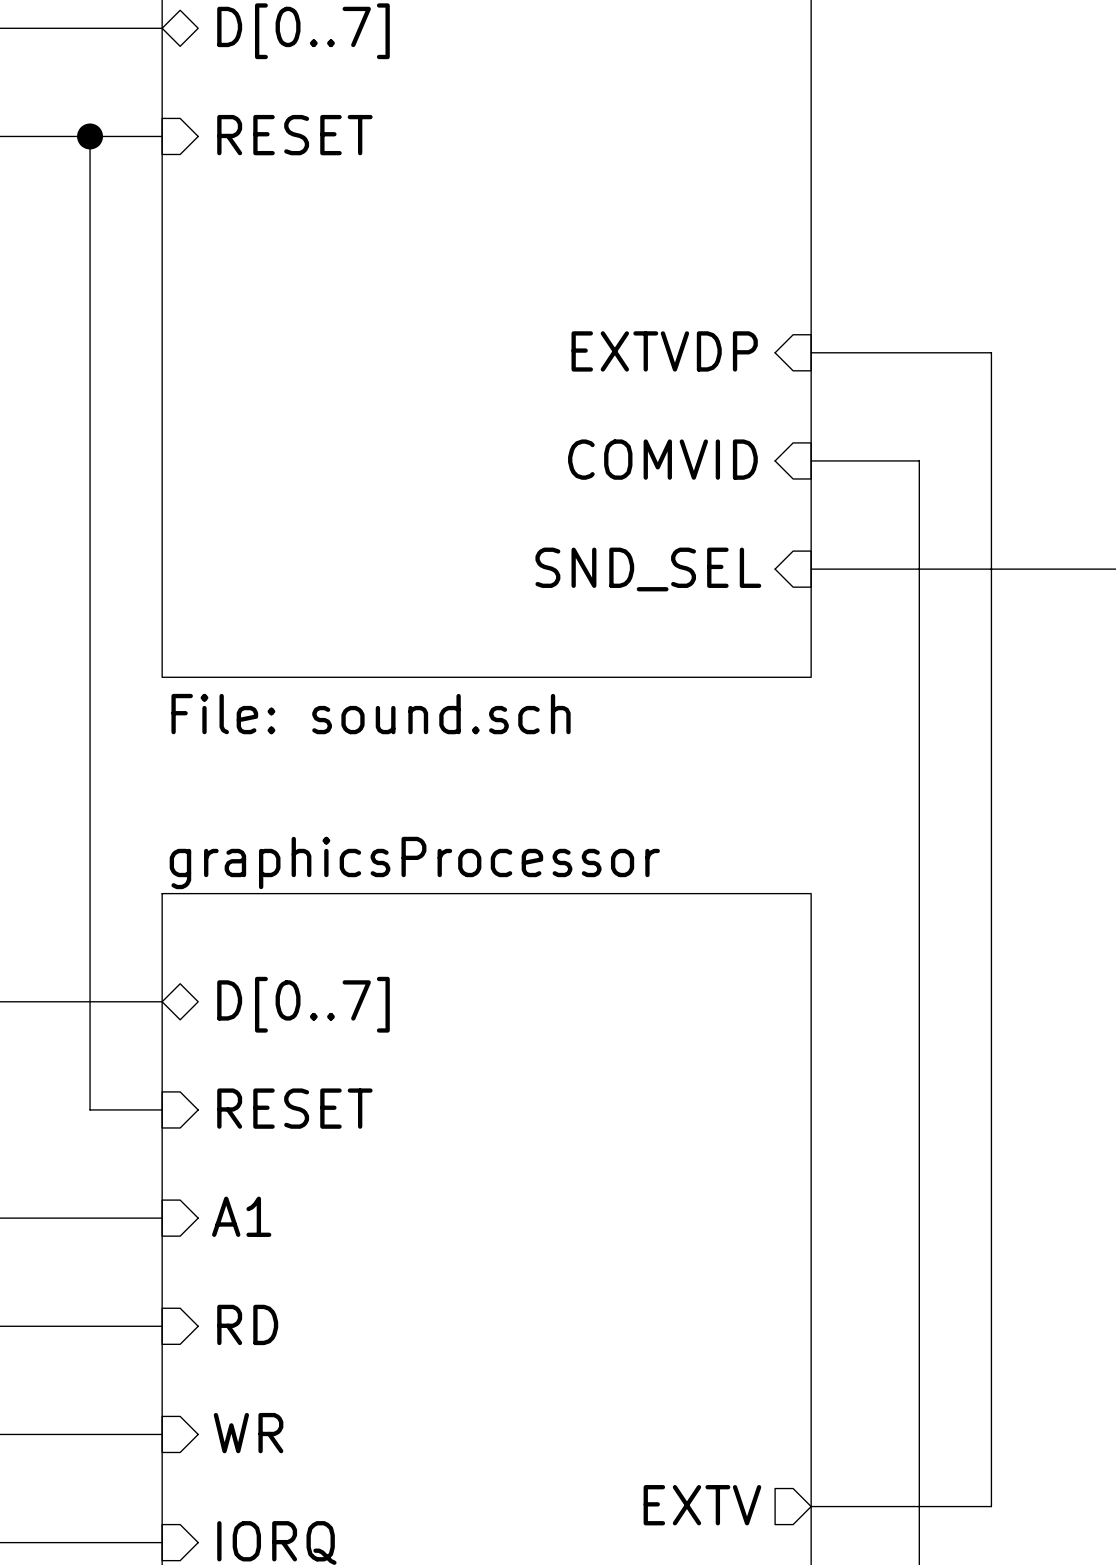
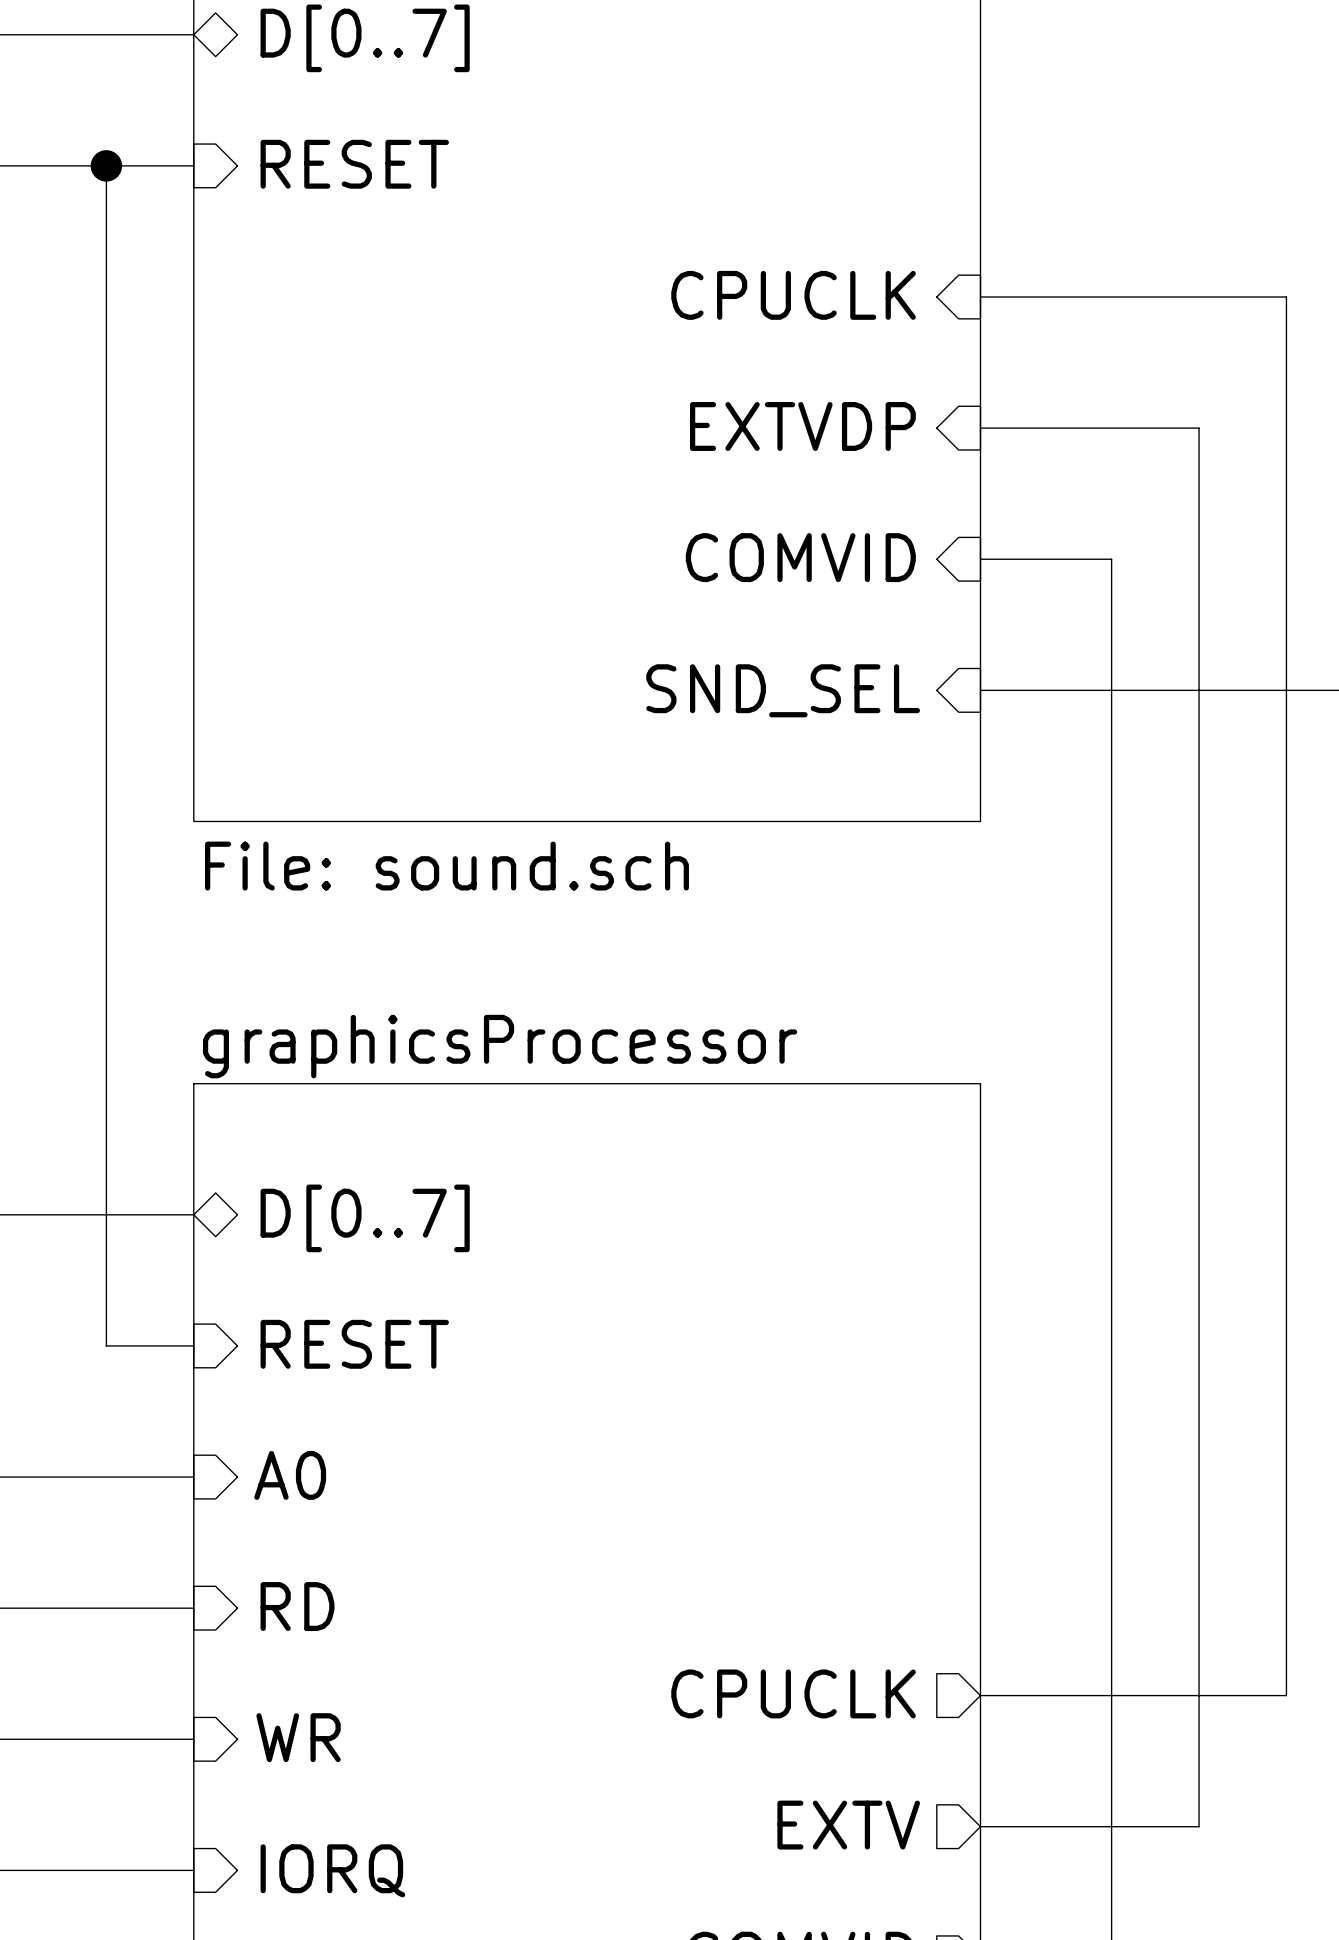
sheet pin: none -> CPUCLK (793, 295)
wire: none -> (980, 297) (1286, 297) (1286, 1695) (980, 1695)
sheet pin: A1 (241, 1216) -> A0 (290, 1475)
sheet pin: none -> CPUCLK (793, 1693)

